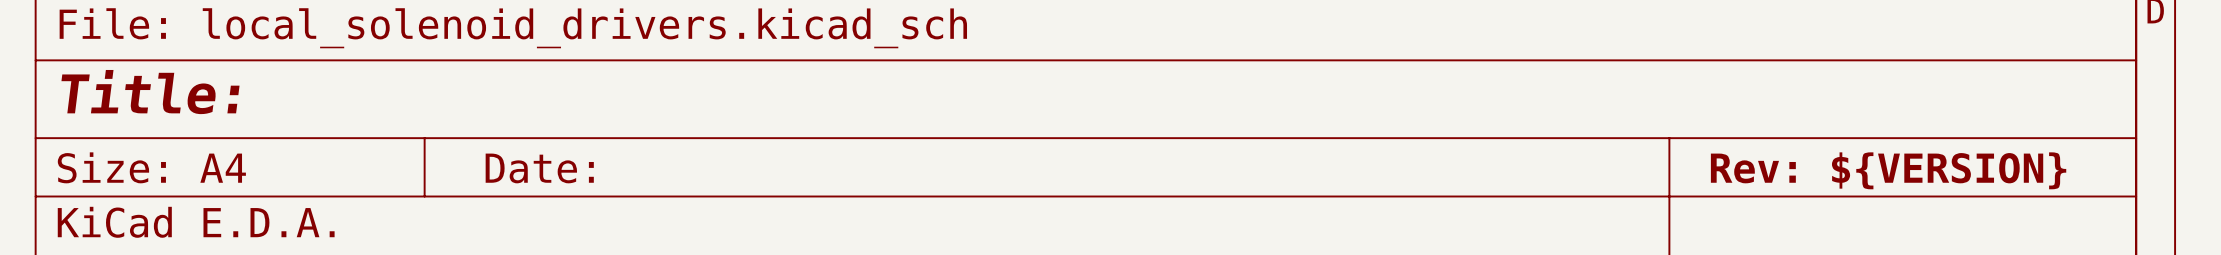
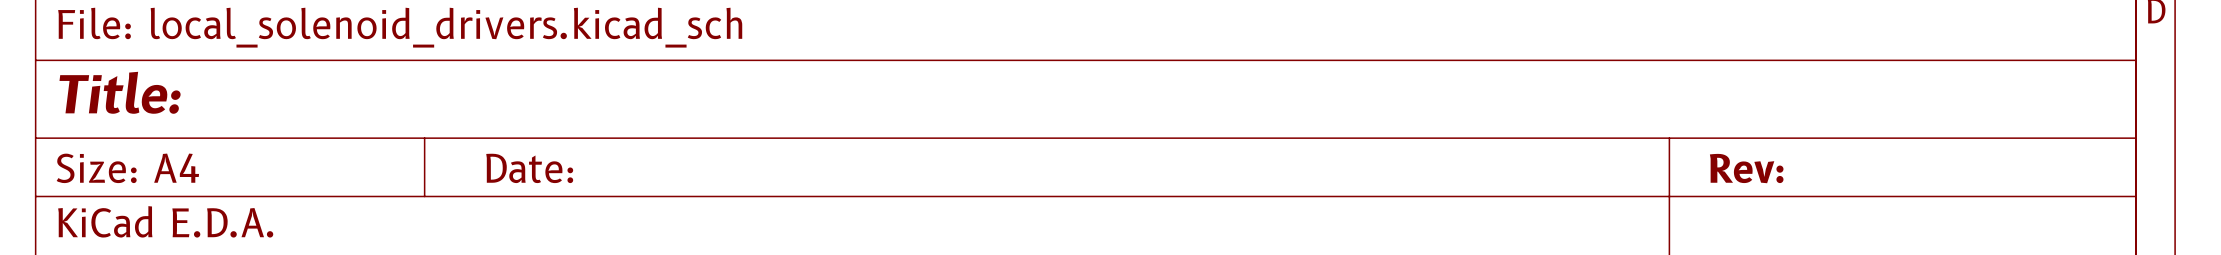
title block: Rev: ${VERSION} (1888, 170) -> Rev: (1746, 168)

